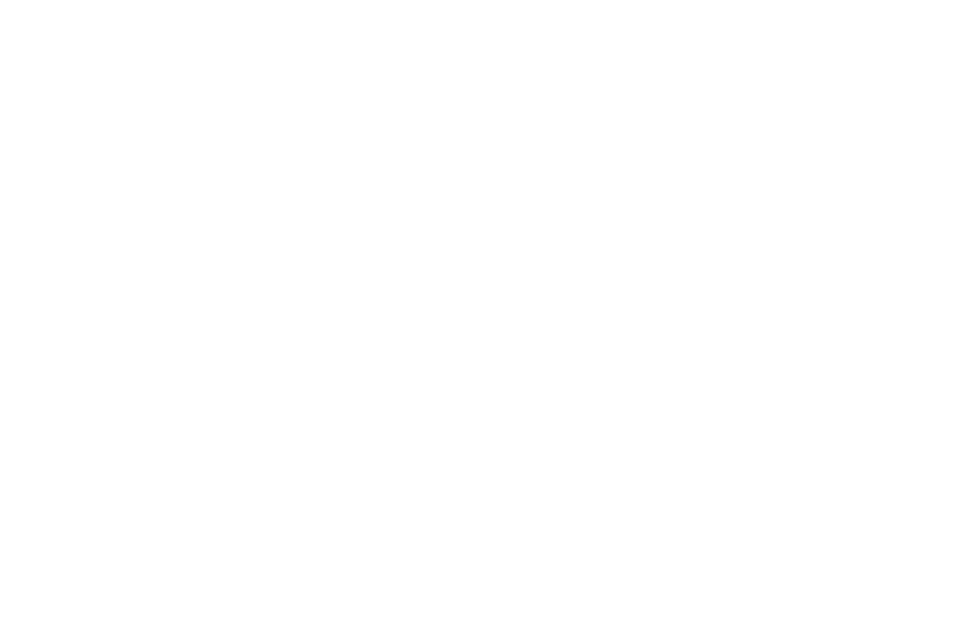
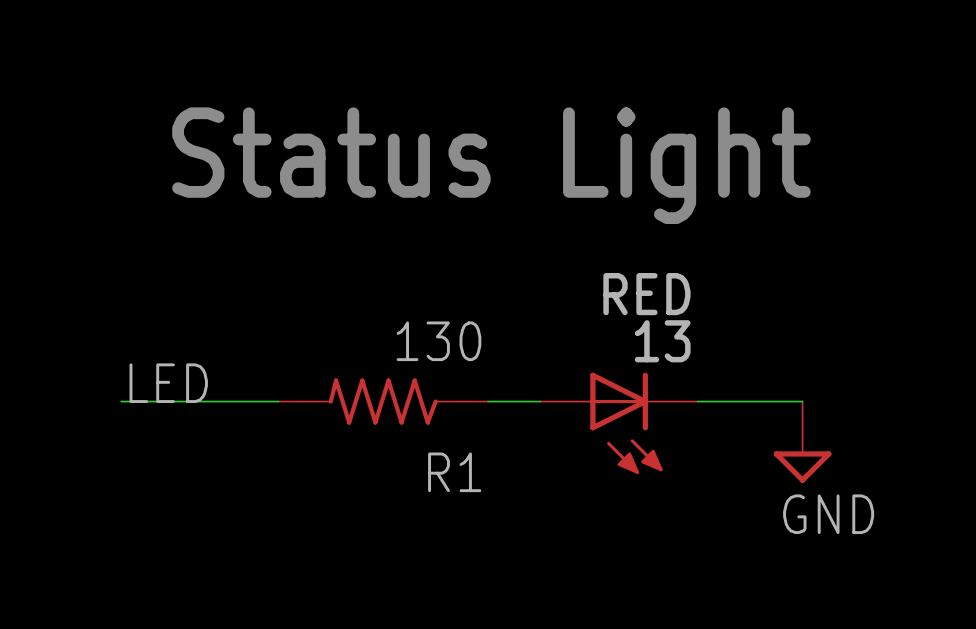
text: none -> Status Light (491, 165)
label: none -> LED (168, 383)
wire: none -> (121, 401) (278, 401)
R1: none -> 130 (383, 401)
wire: none -> (488, 401) (540, 401)
wire: none -> (697, 401) (802, 401)
13: none -> RED (619, 423)
power symbol: none -> GND (802, 442)

